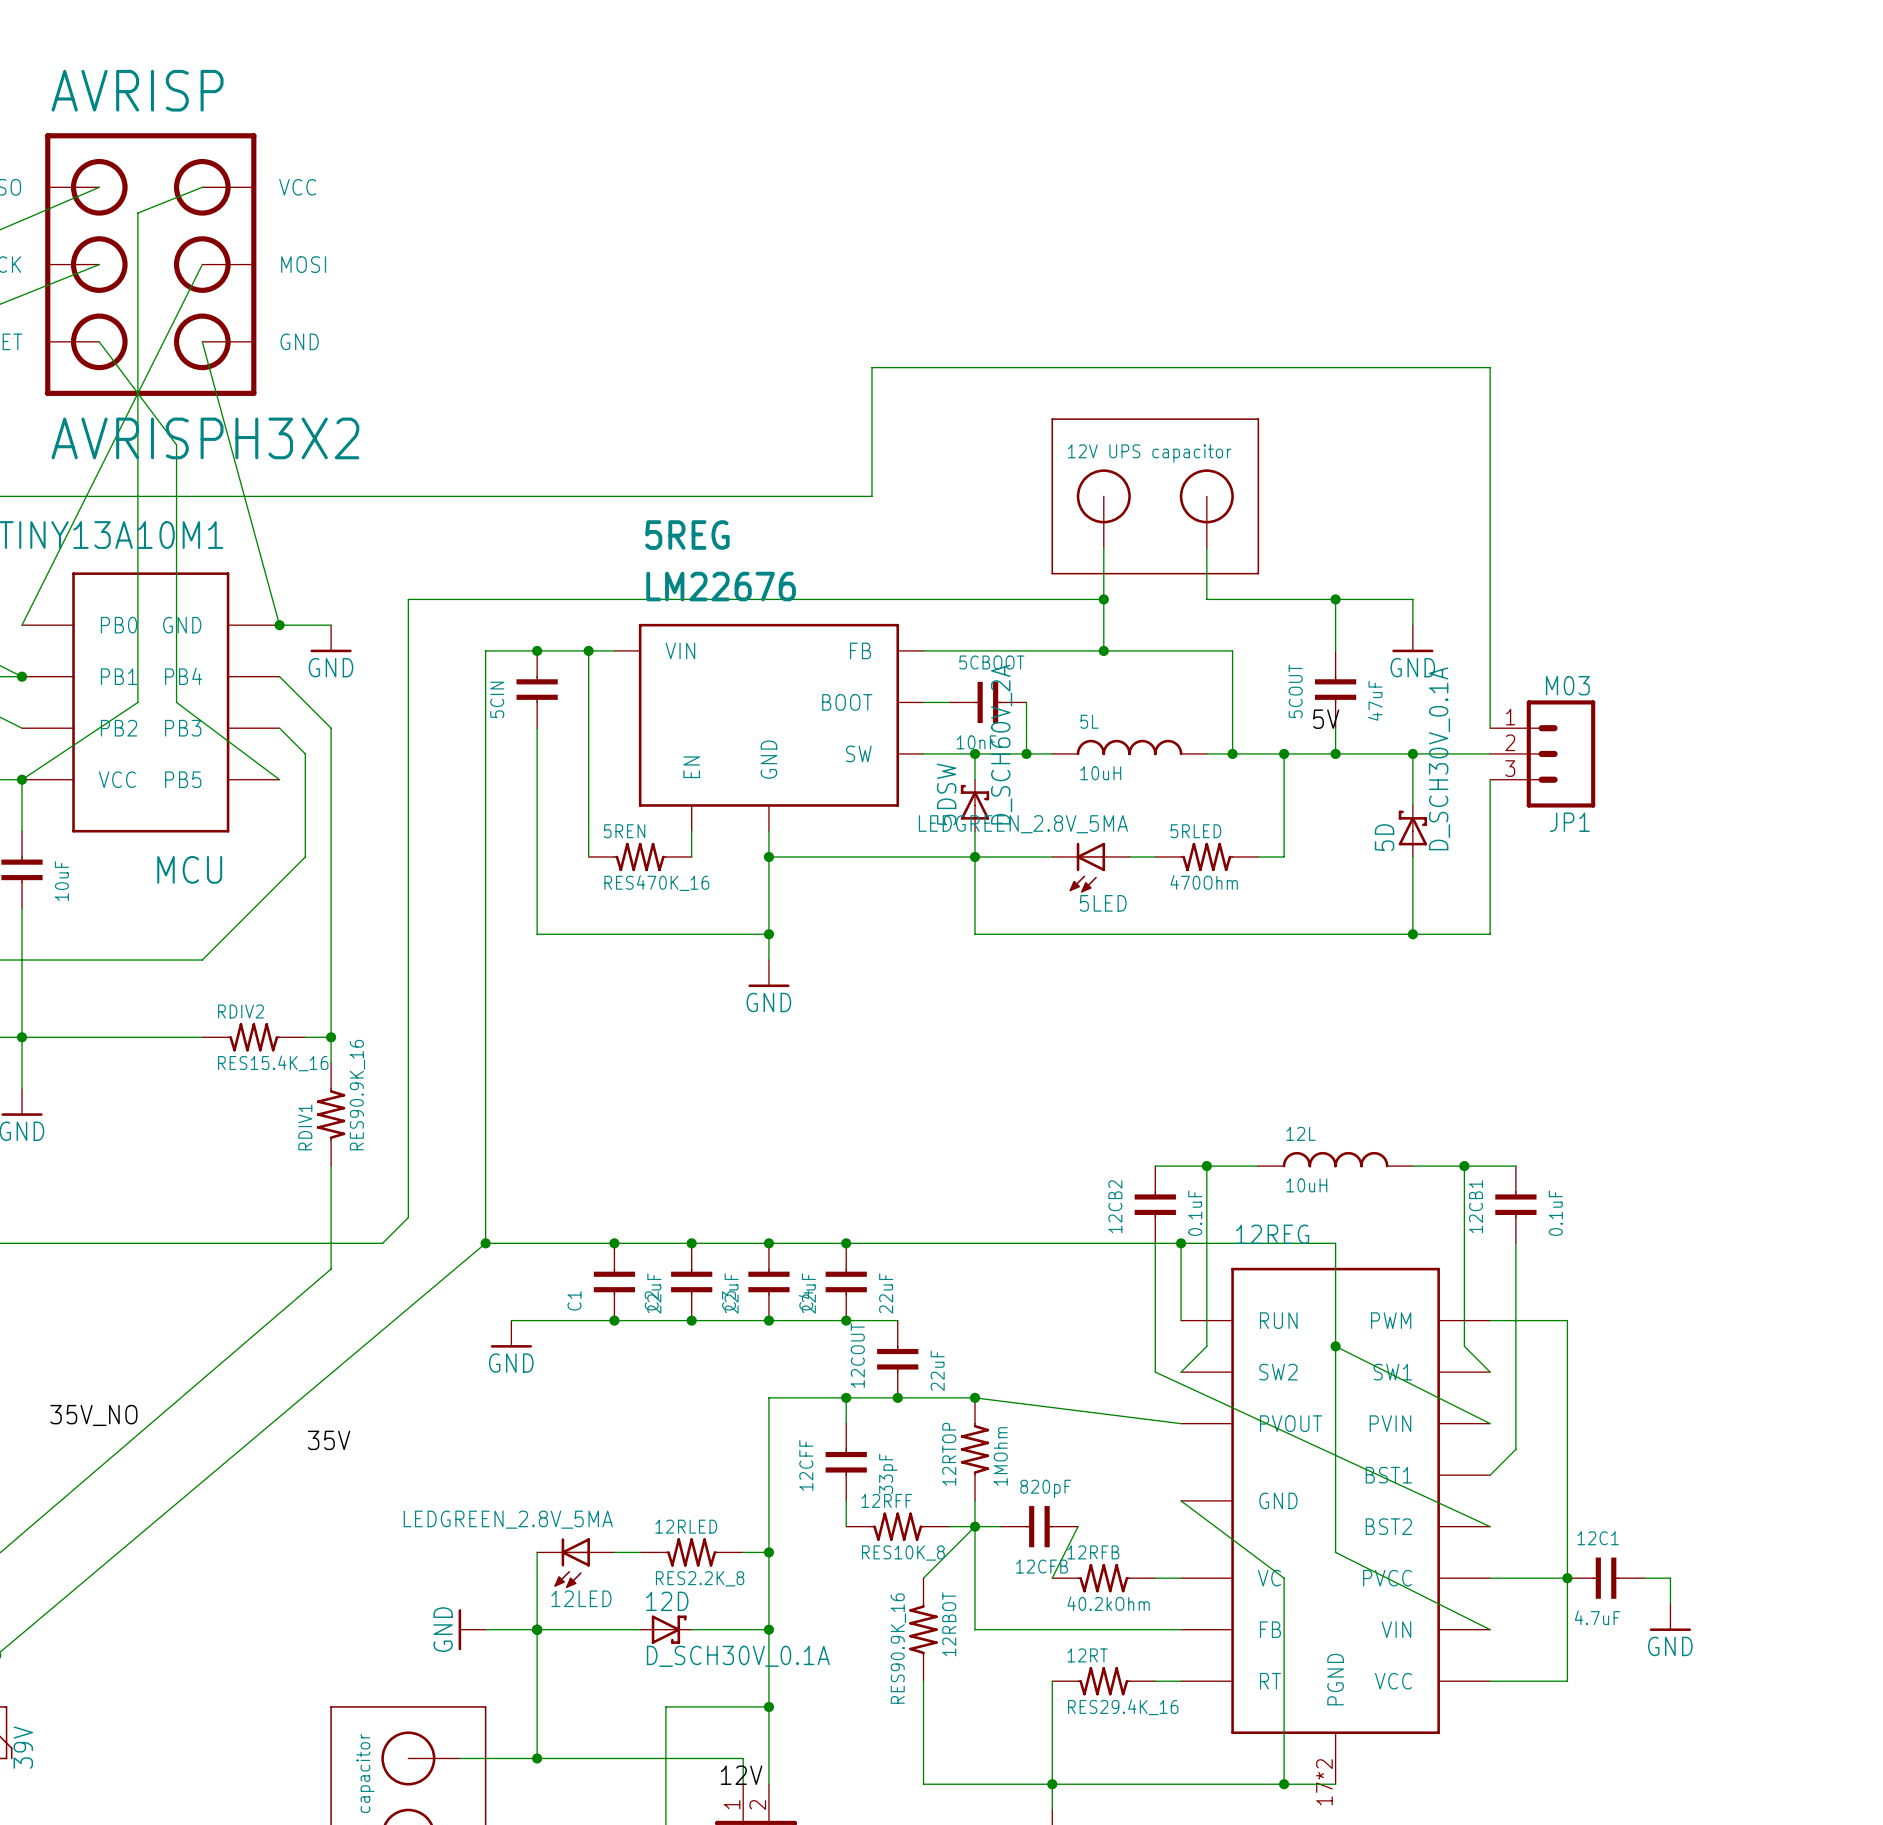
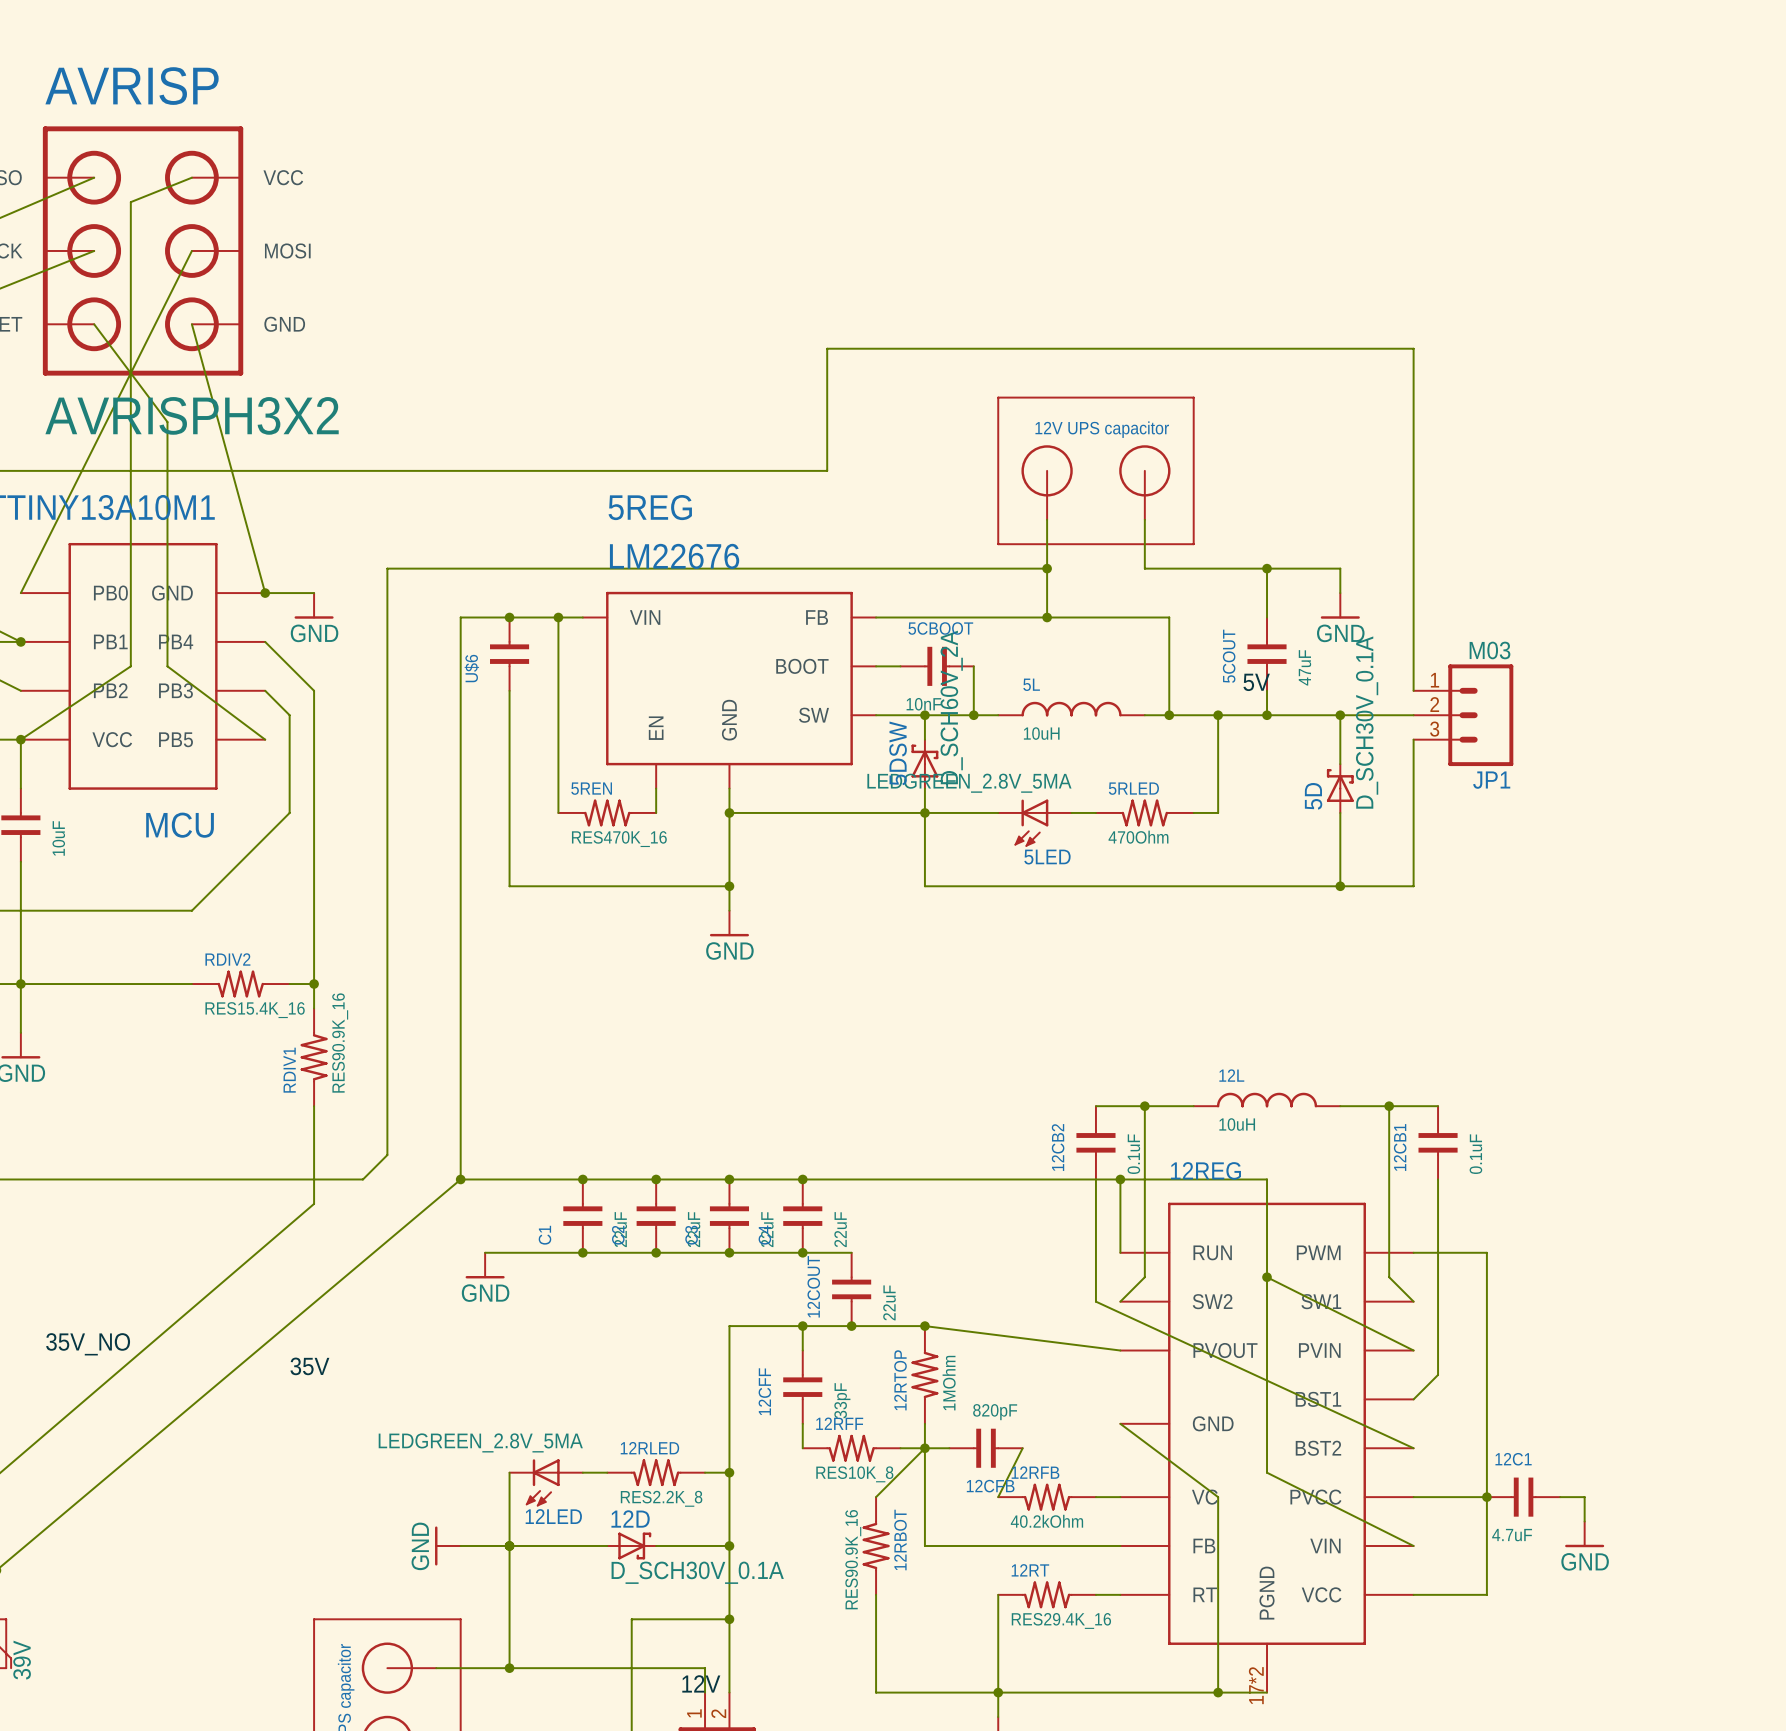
5CIN name: 5CIN (497, 699) -> U$6 (471, 668)

